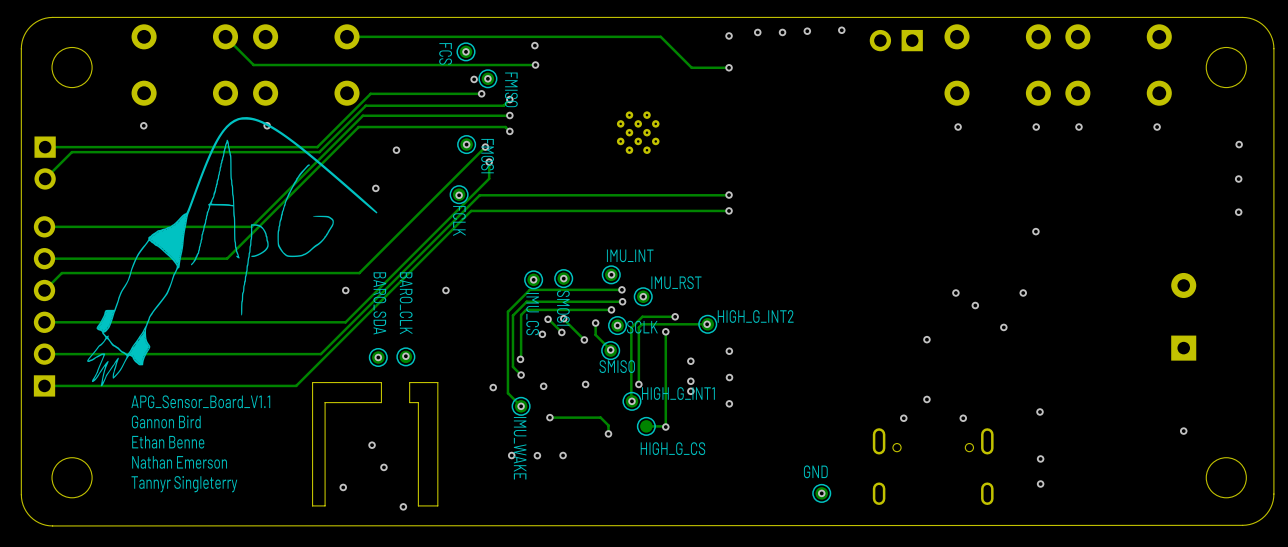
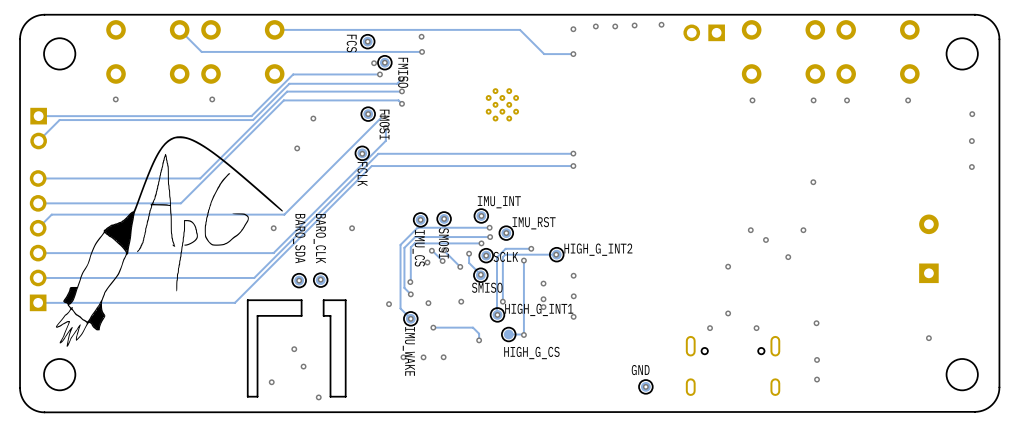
drawing position: (232, 251) -> (169, 241)
text: APG_Sensor_Board_V1.1 (200, 401) -> none
text: Gannon Bird (166, 421) -> none
text: Ethan Benne (168, 442) -> none
text: Nathan Emerson (179, 462) -> none
text: Tannyr Singleterry (184, 484) -> none

